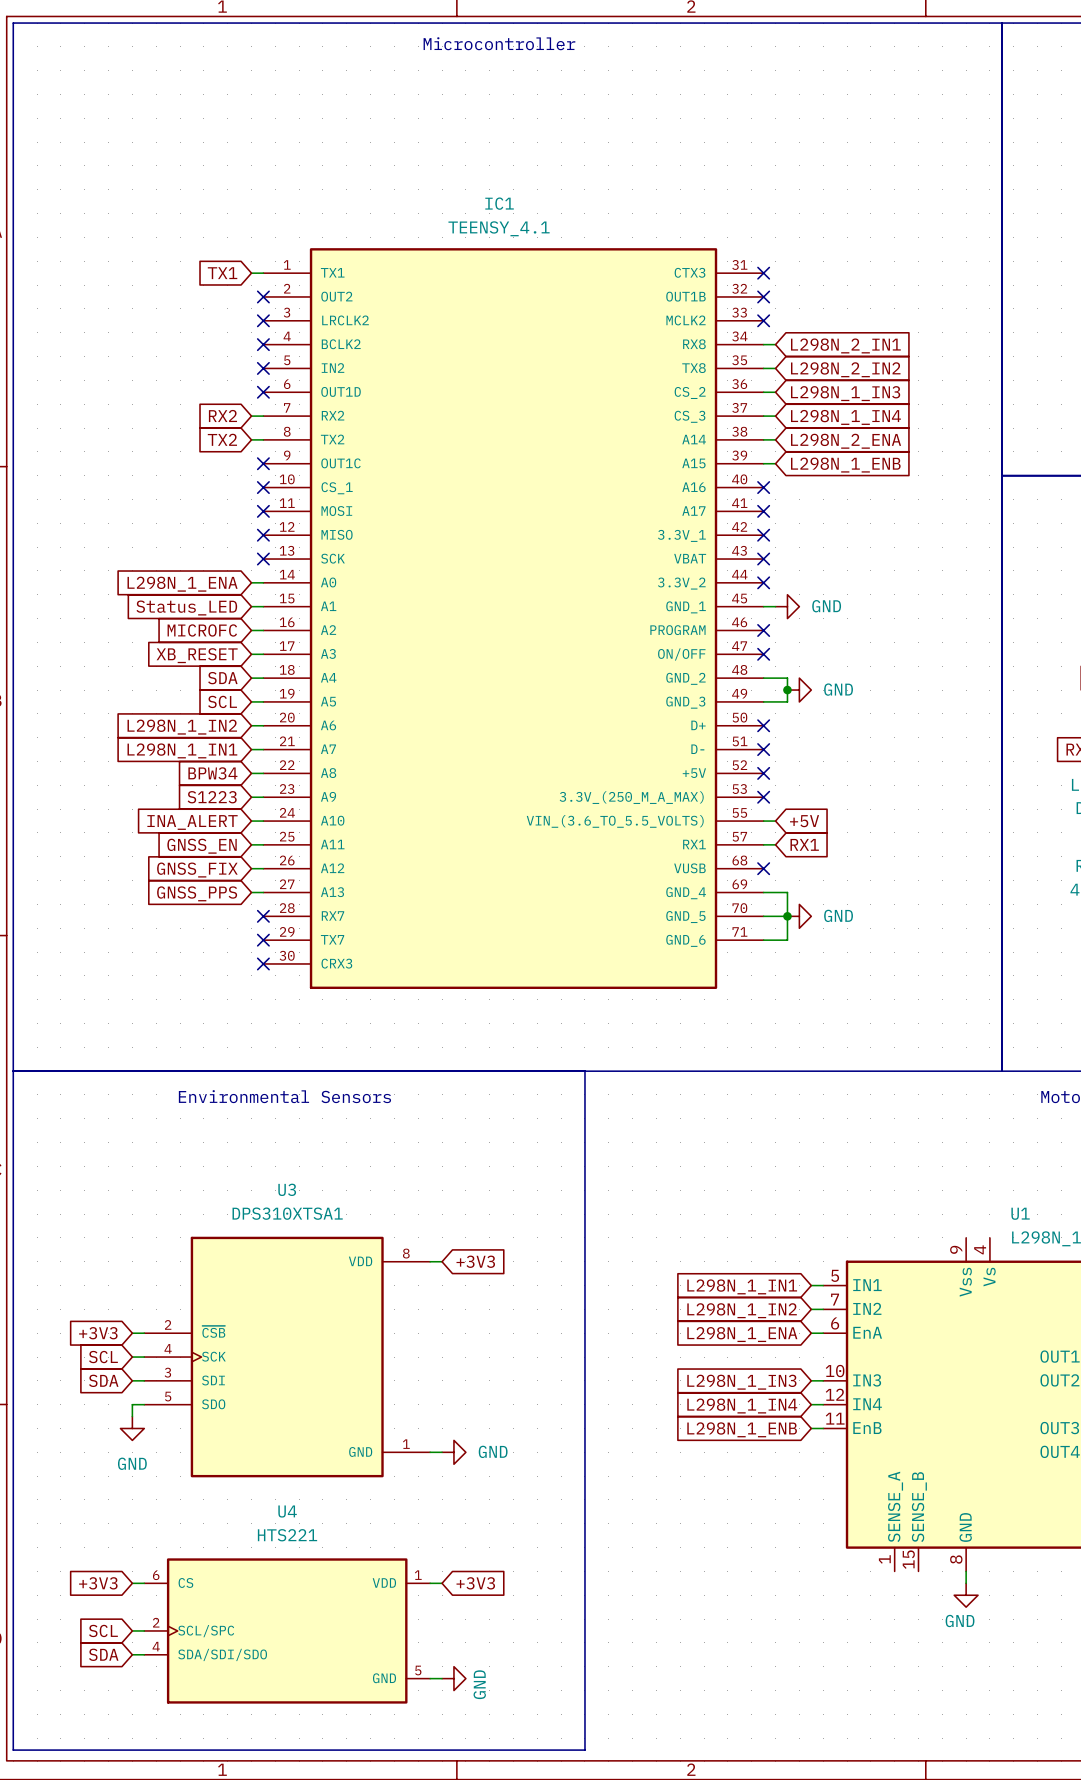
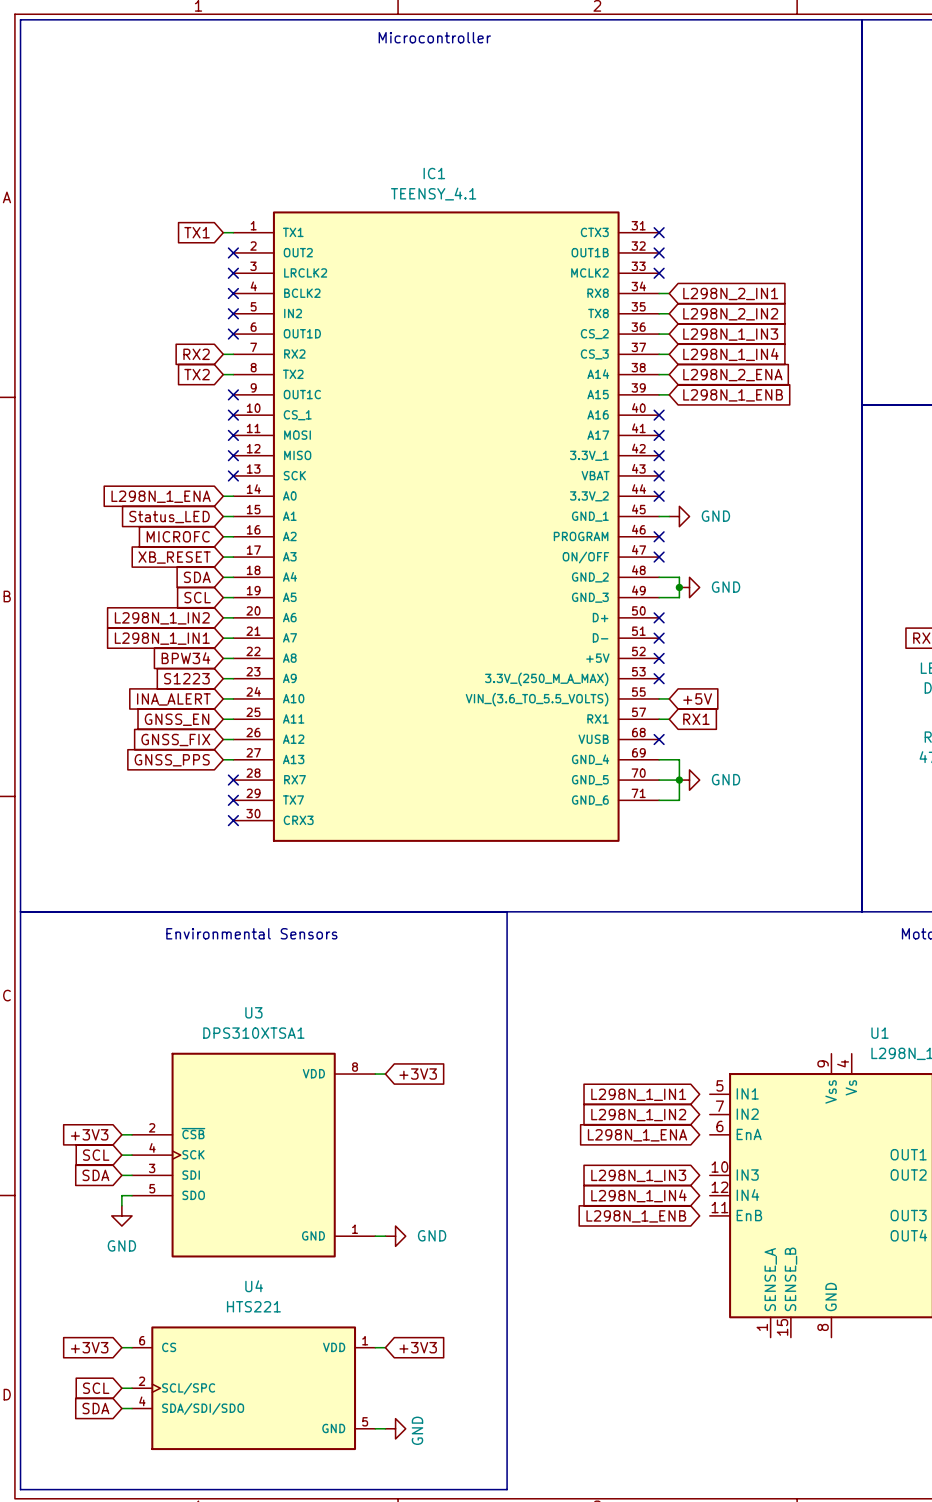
wire: (811, 1285) (823, 1285) -> none
wire: (811, 1309) (823, 1309) -> none
wire: (811, 1333) (823, 1333) -> none
wire: (811, 1380) (823, 1380) -> none
wire: (811, 1404) (823, 1404) -> none
wire: (811, 1428) (823, 1428) -> none
wire: (966, 1571) (966, 1583) -> none
power symbol: GND (966, 1595) -> none

